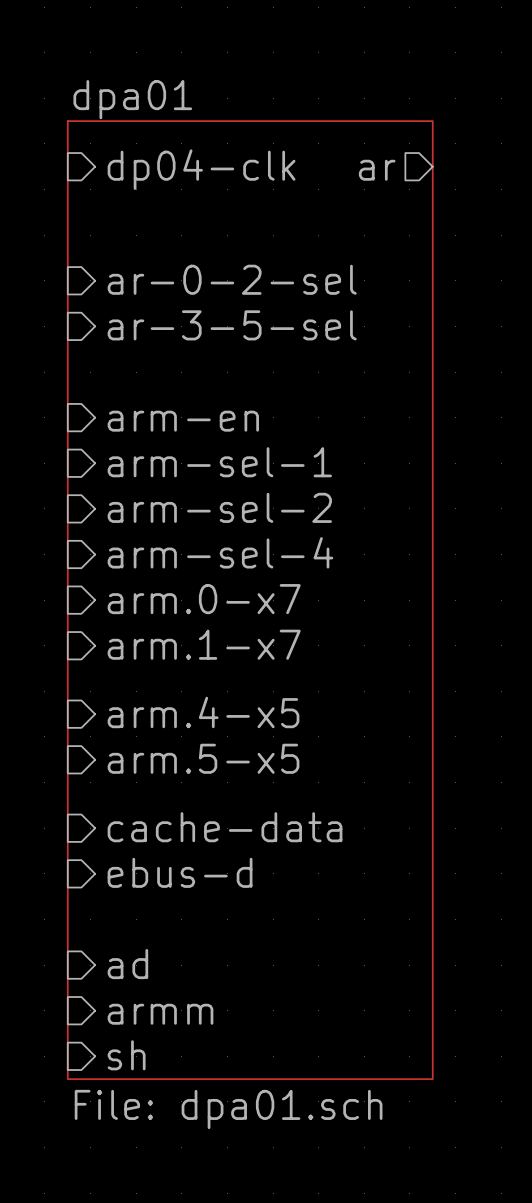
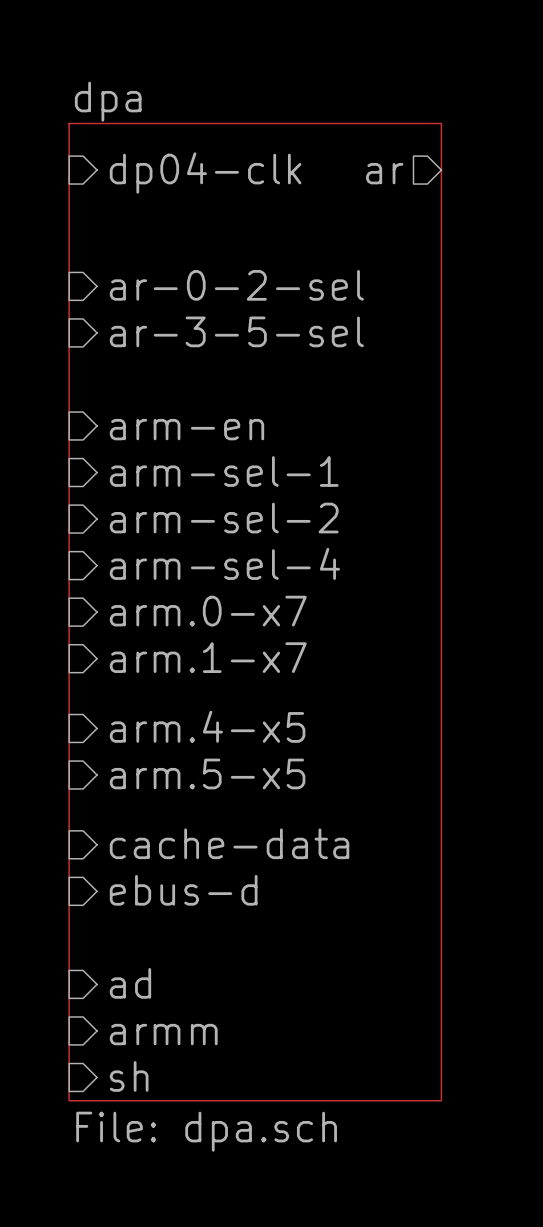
sheet dpa01 name: dpa01 (132, 99) -> dpa (108, 101)
sheet dpa01 value: File: dpa01.sch (228, 1109) -> File: dpa.sch (206, 1131)

